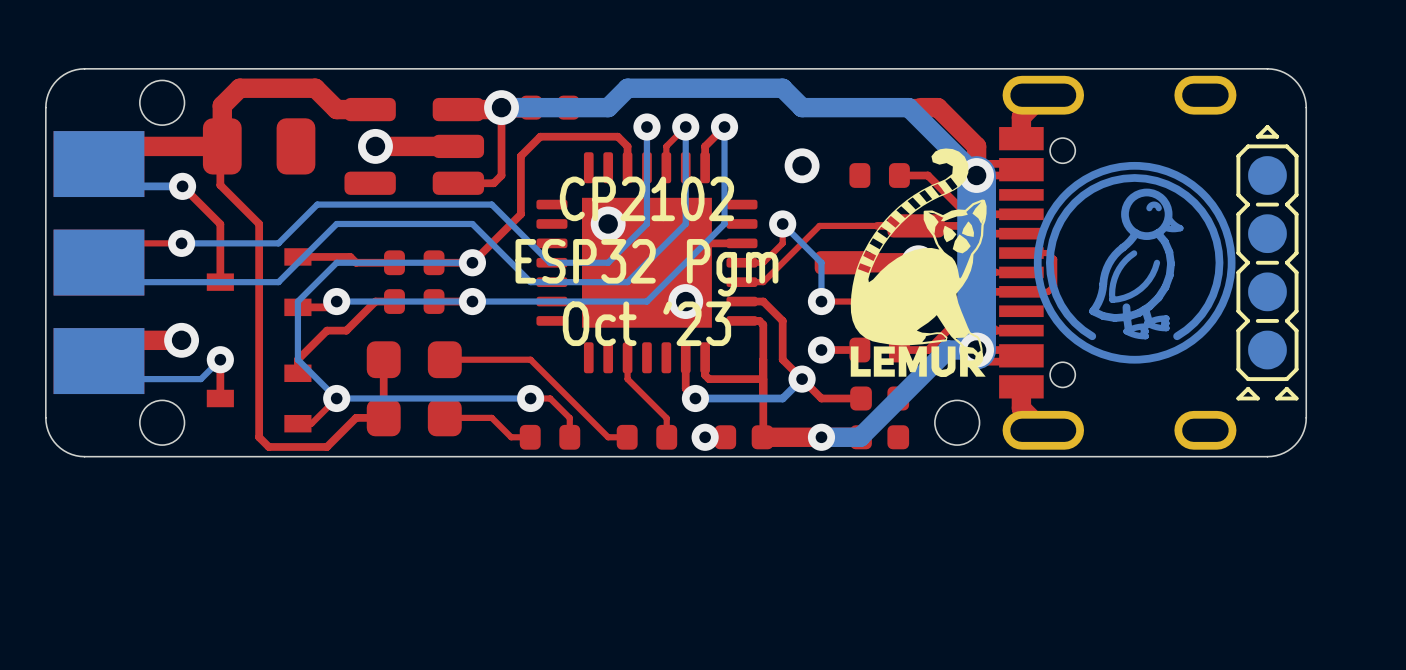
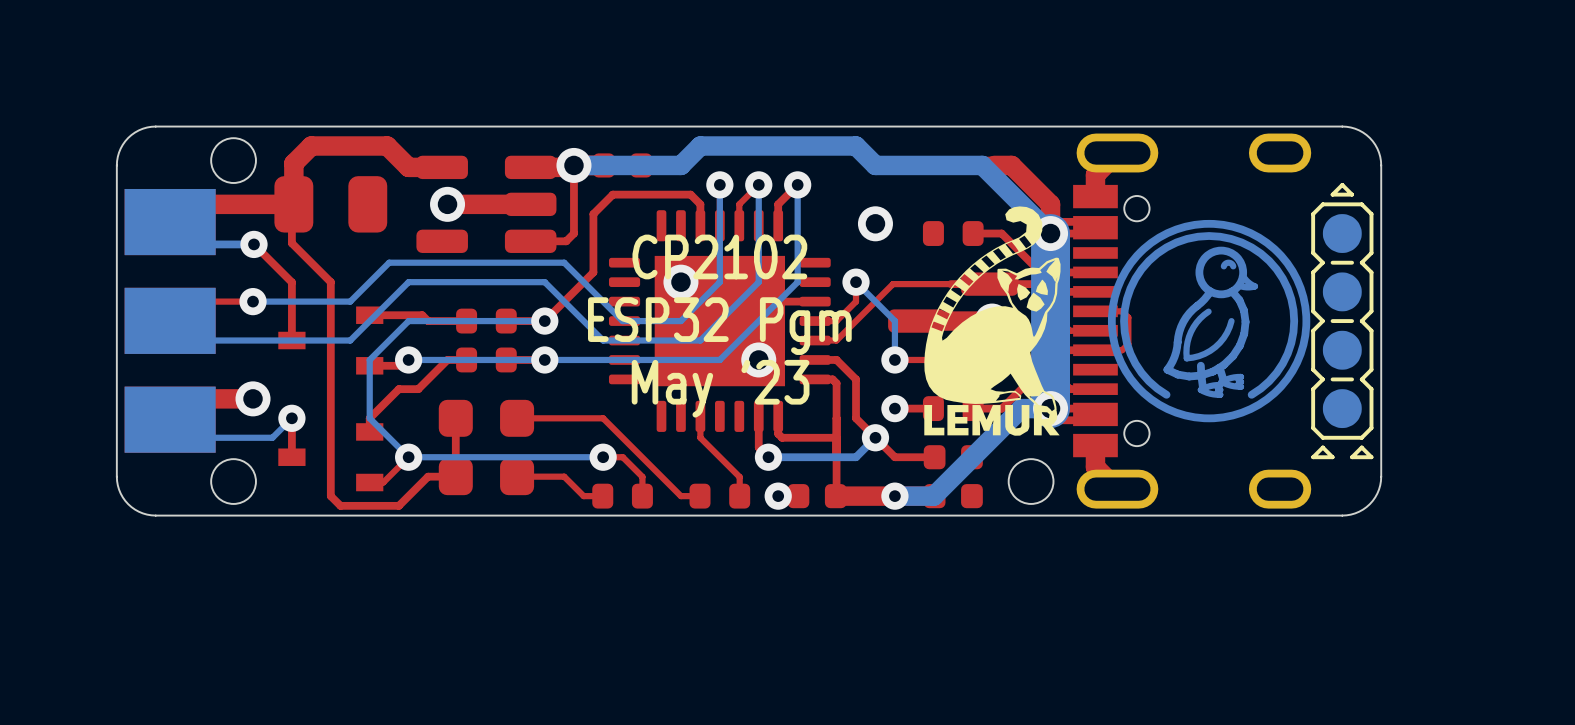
text: Oct '23 (646, 323) -> May '23 (720, 388)

